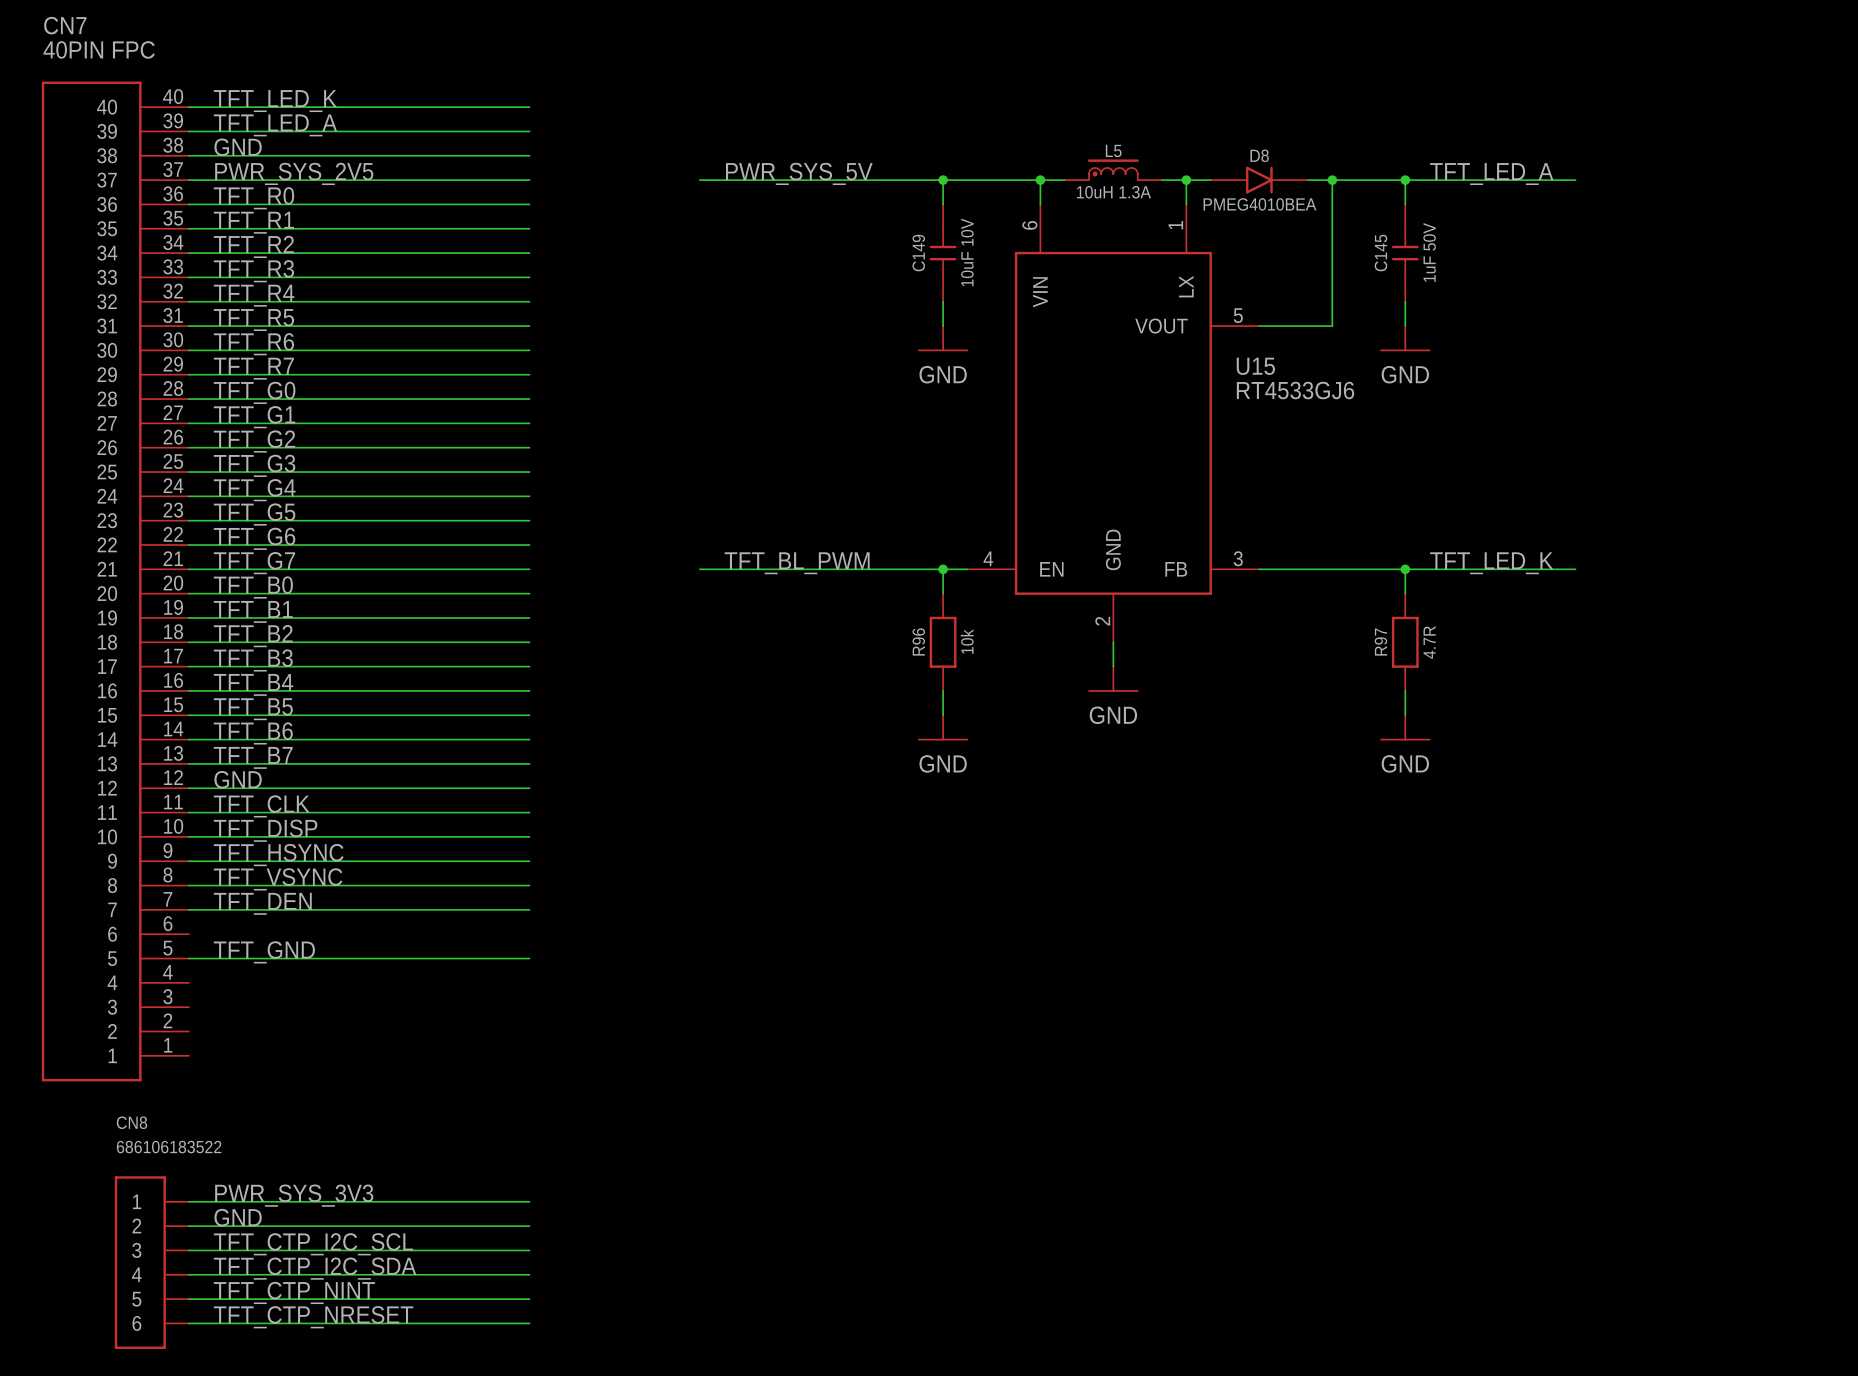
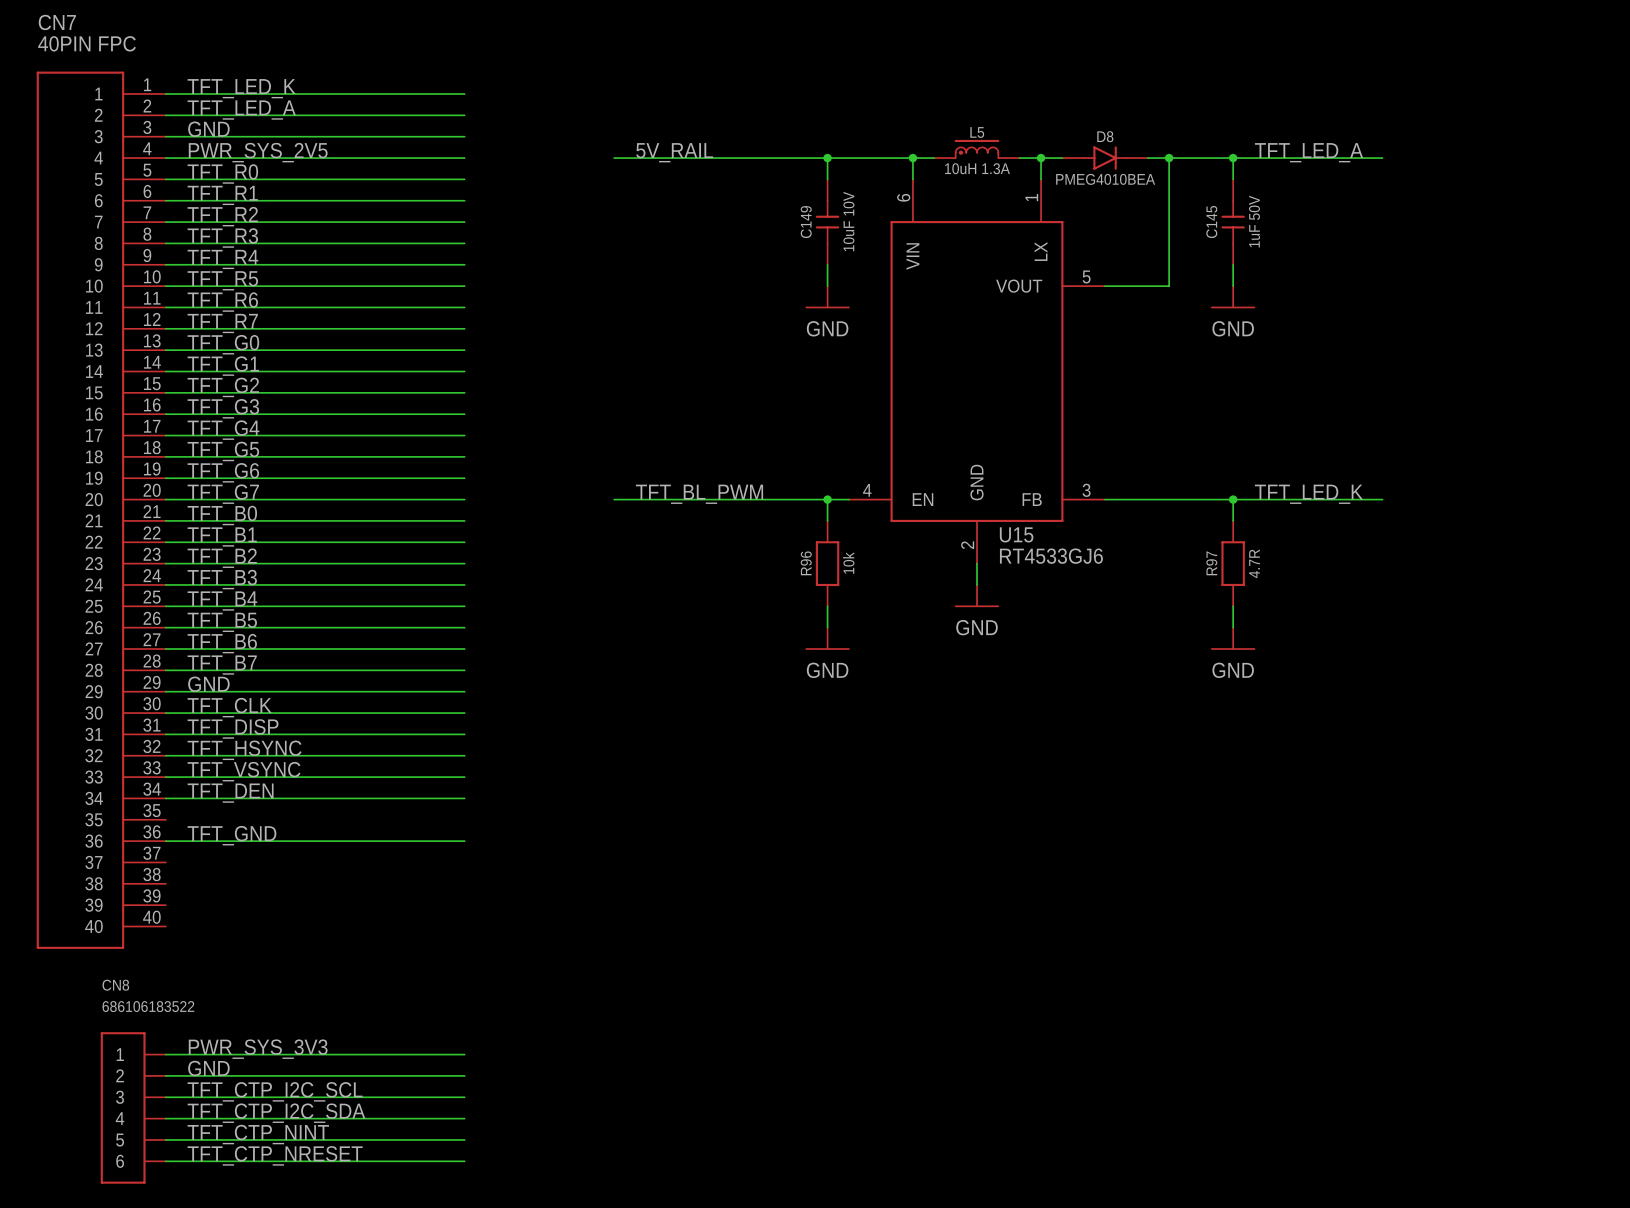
label: PWR_SYS_5V (799, 173) -> 5V_RAIL (674, 152)
U15 name position: U15 (1255, 366) -> U15 (1016, 534)
U15 value position: RT4533GJ6 (1295, 390) -> RT4533GJ6 (1051, 556)
CN7 flip: as is (91, 581) -> up-down (80, 510)

